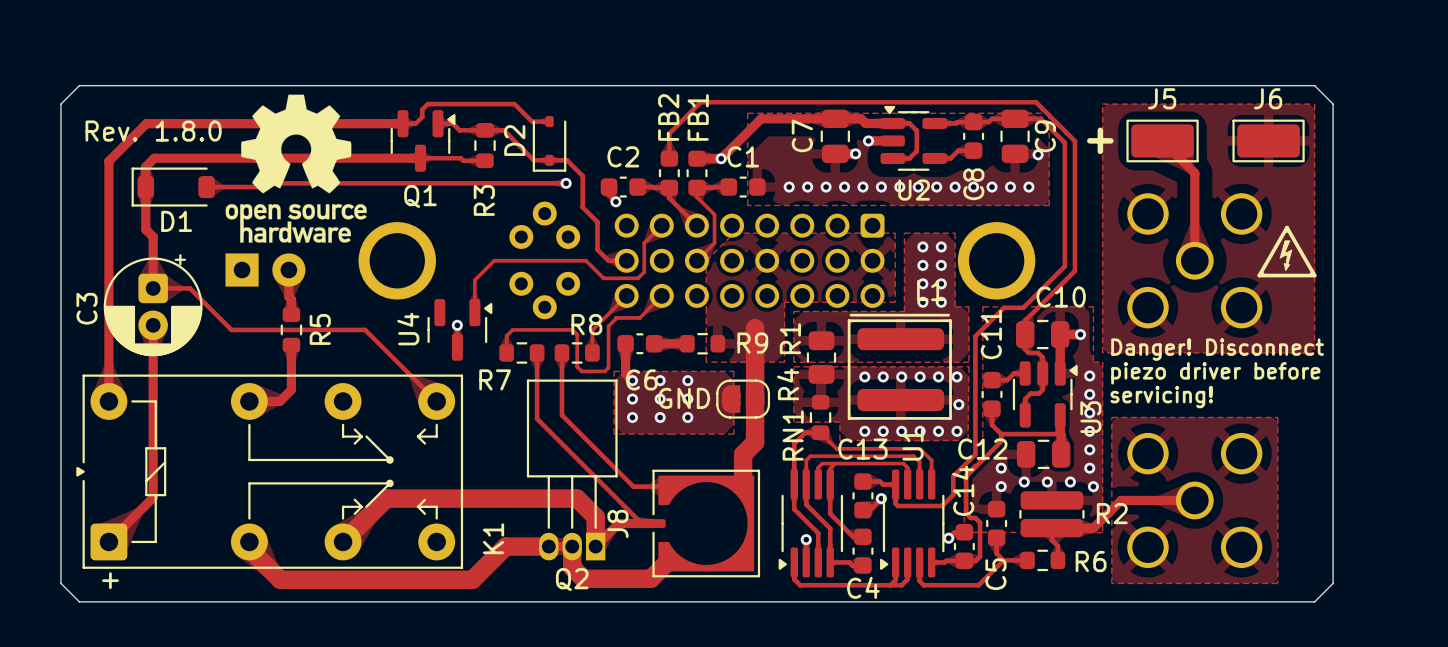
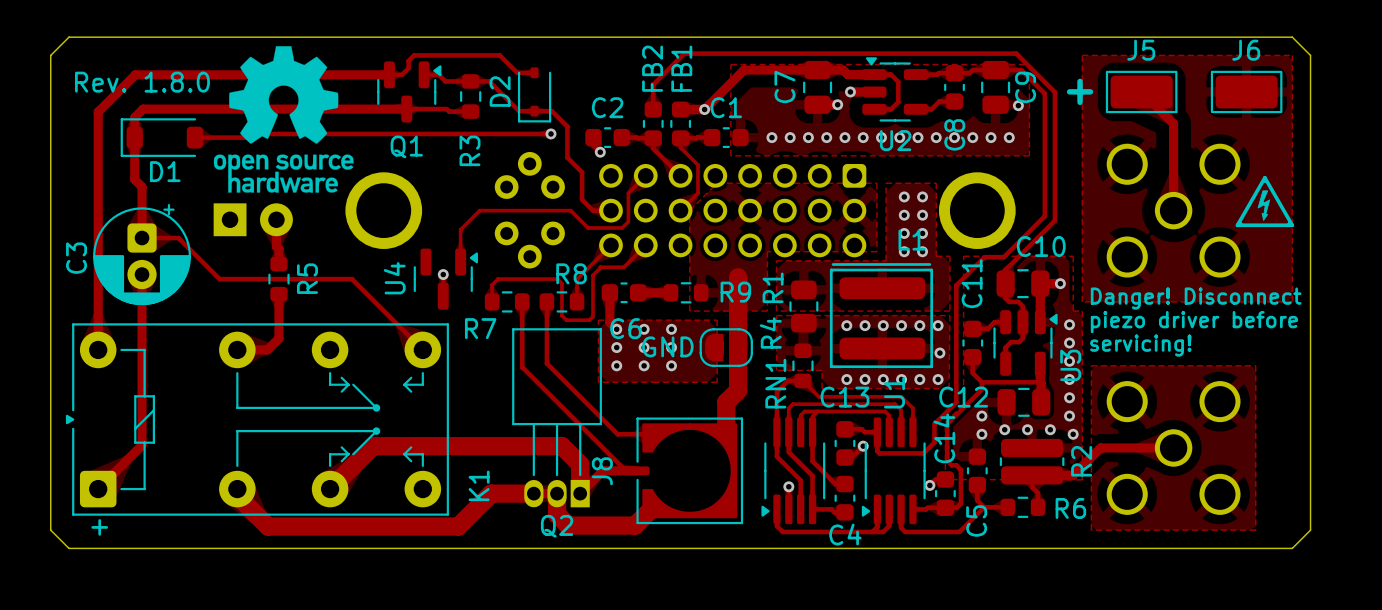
R2 name rotation: 0° (1112, 513) -> 90° counterclockwise (1081, 461)

